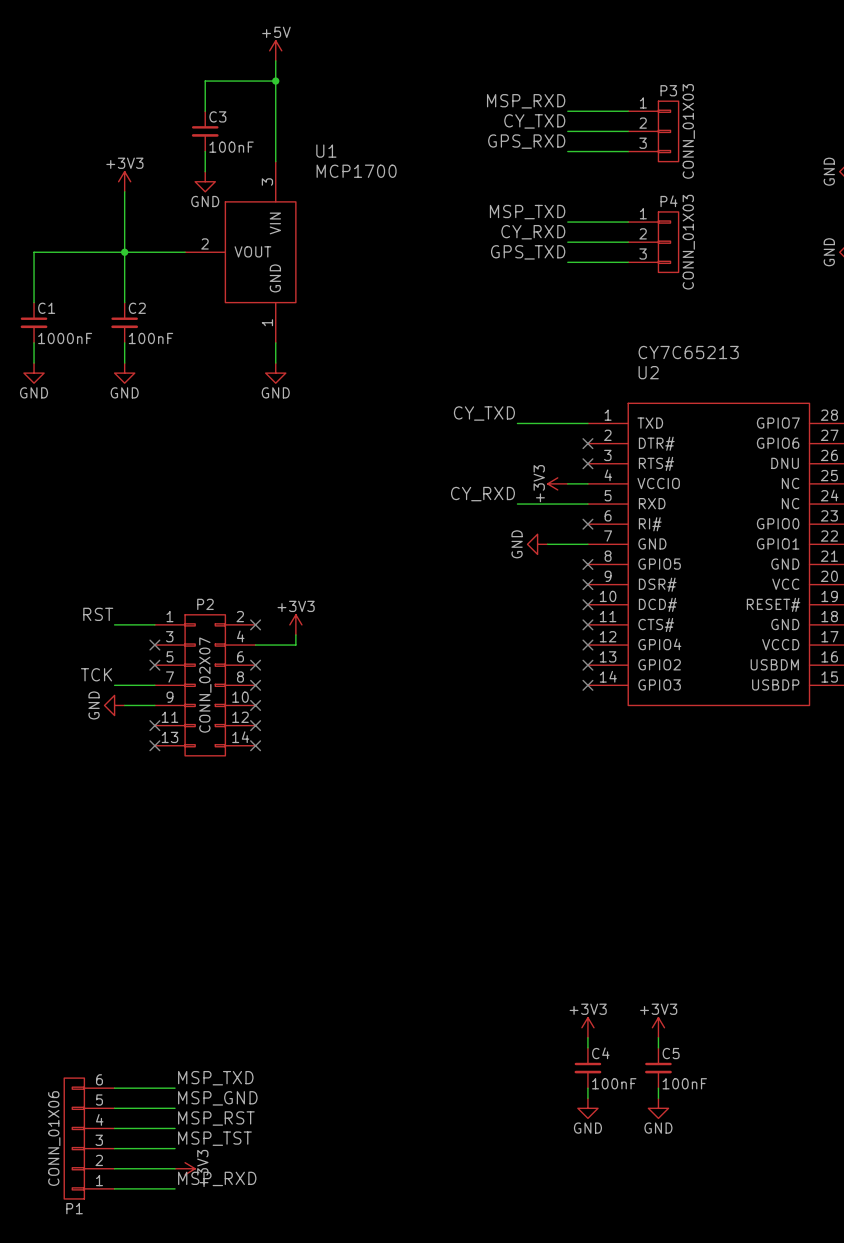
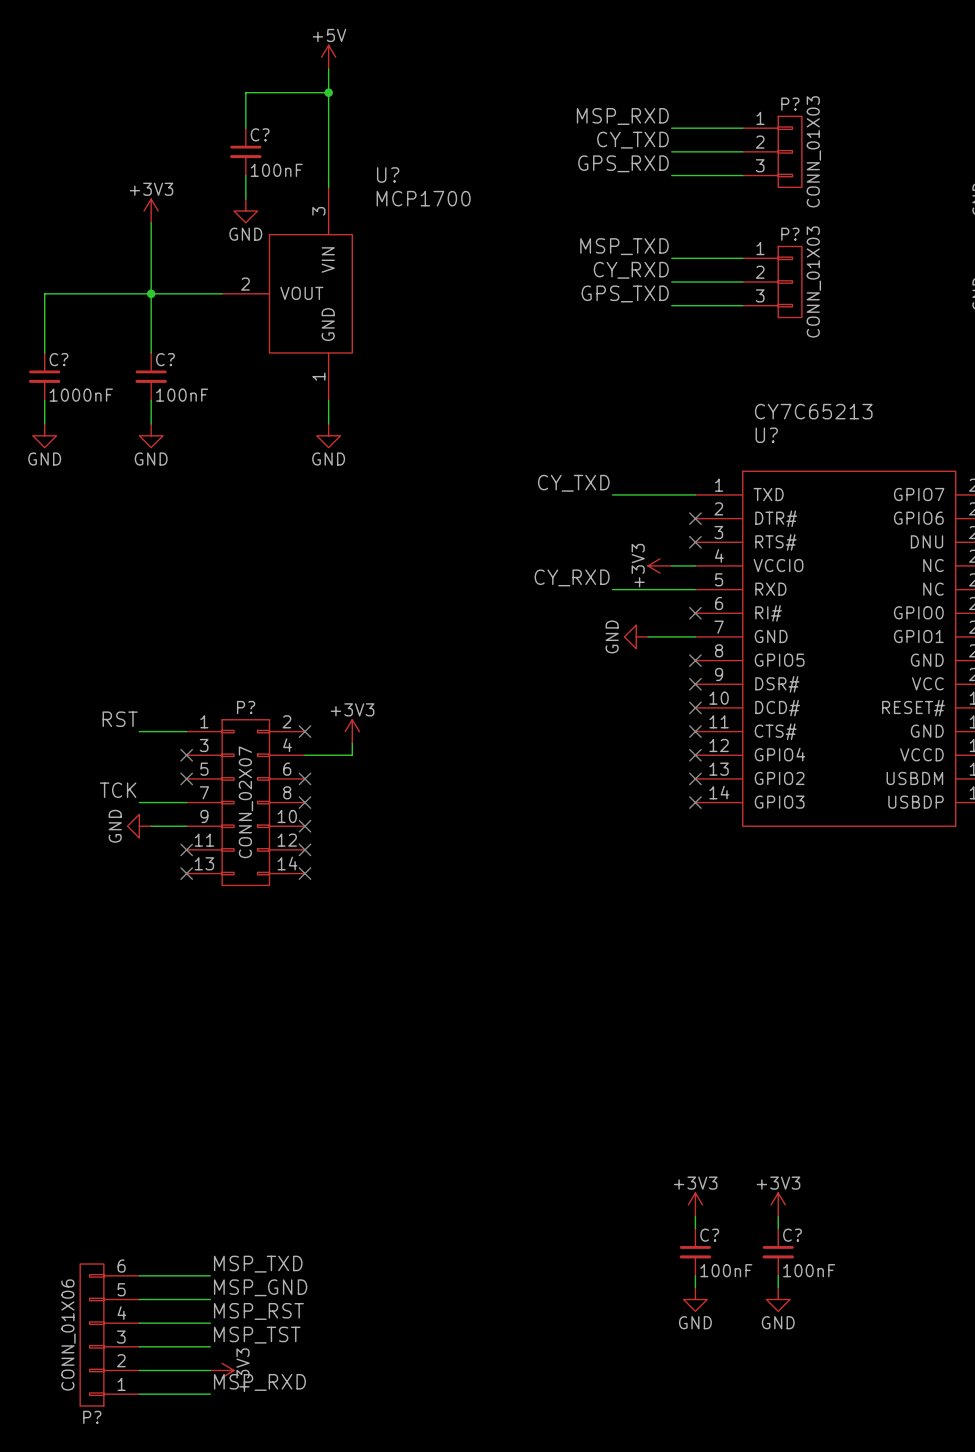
P3 name: P3 (668, 90) -> P? (790, 104)
C3 name: C3 (217, 116) -> C? (260, 134)
U1 name: U1 (326, 151) -> U? (388, 174)
P4 name: P4 (668, 201) -> P? (790, 234)
C1 name: C1 (46, 308) -> C? (58, 359)
C2 name: C2 (137, 308) -> C? (165, 359)
U2 name: U2 (648, 372) -> U? (766, 435)
P2 name: P2 (205, 604) -> P? (246, 707)
C4 name: C4 (600, 1053) -> C? (709, 1235)
C5 name: C5 (671, 1053) -> C? (792, 1235)
P1 name: P1 (74, 1208) -> P? (92, 1417)

